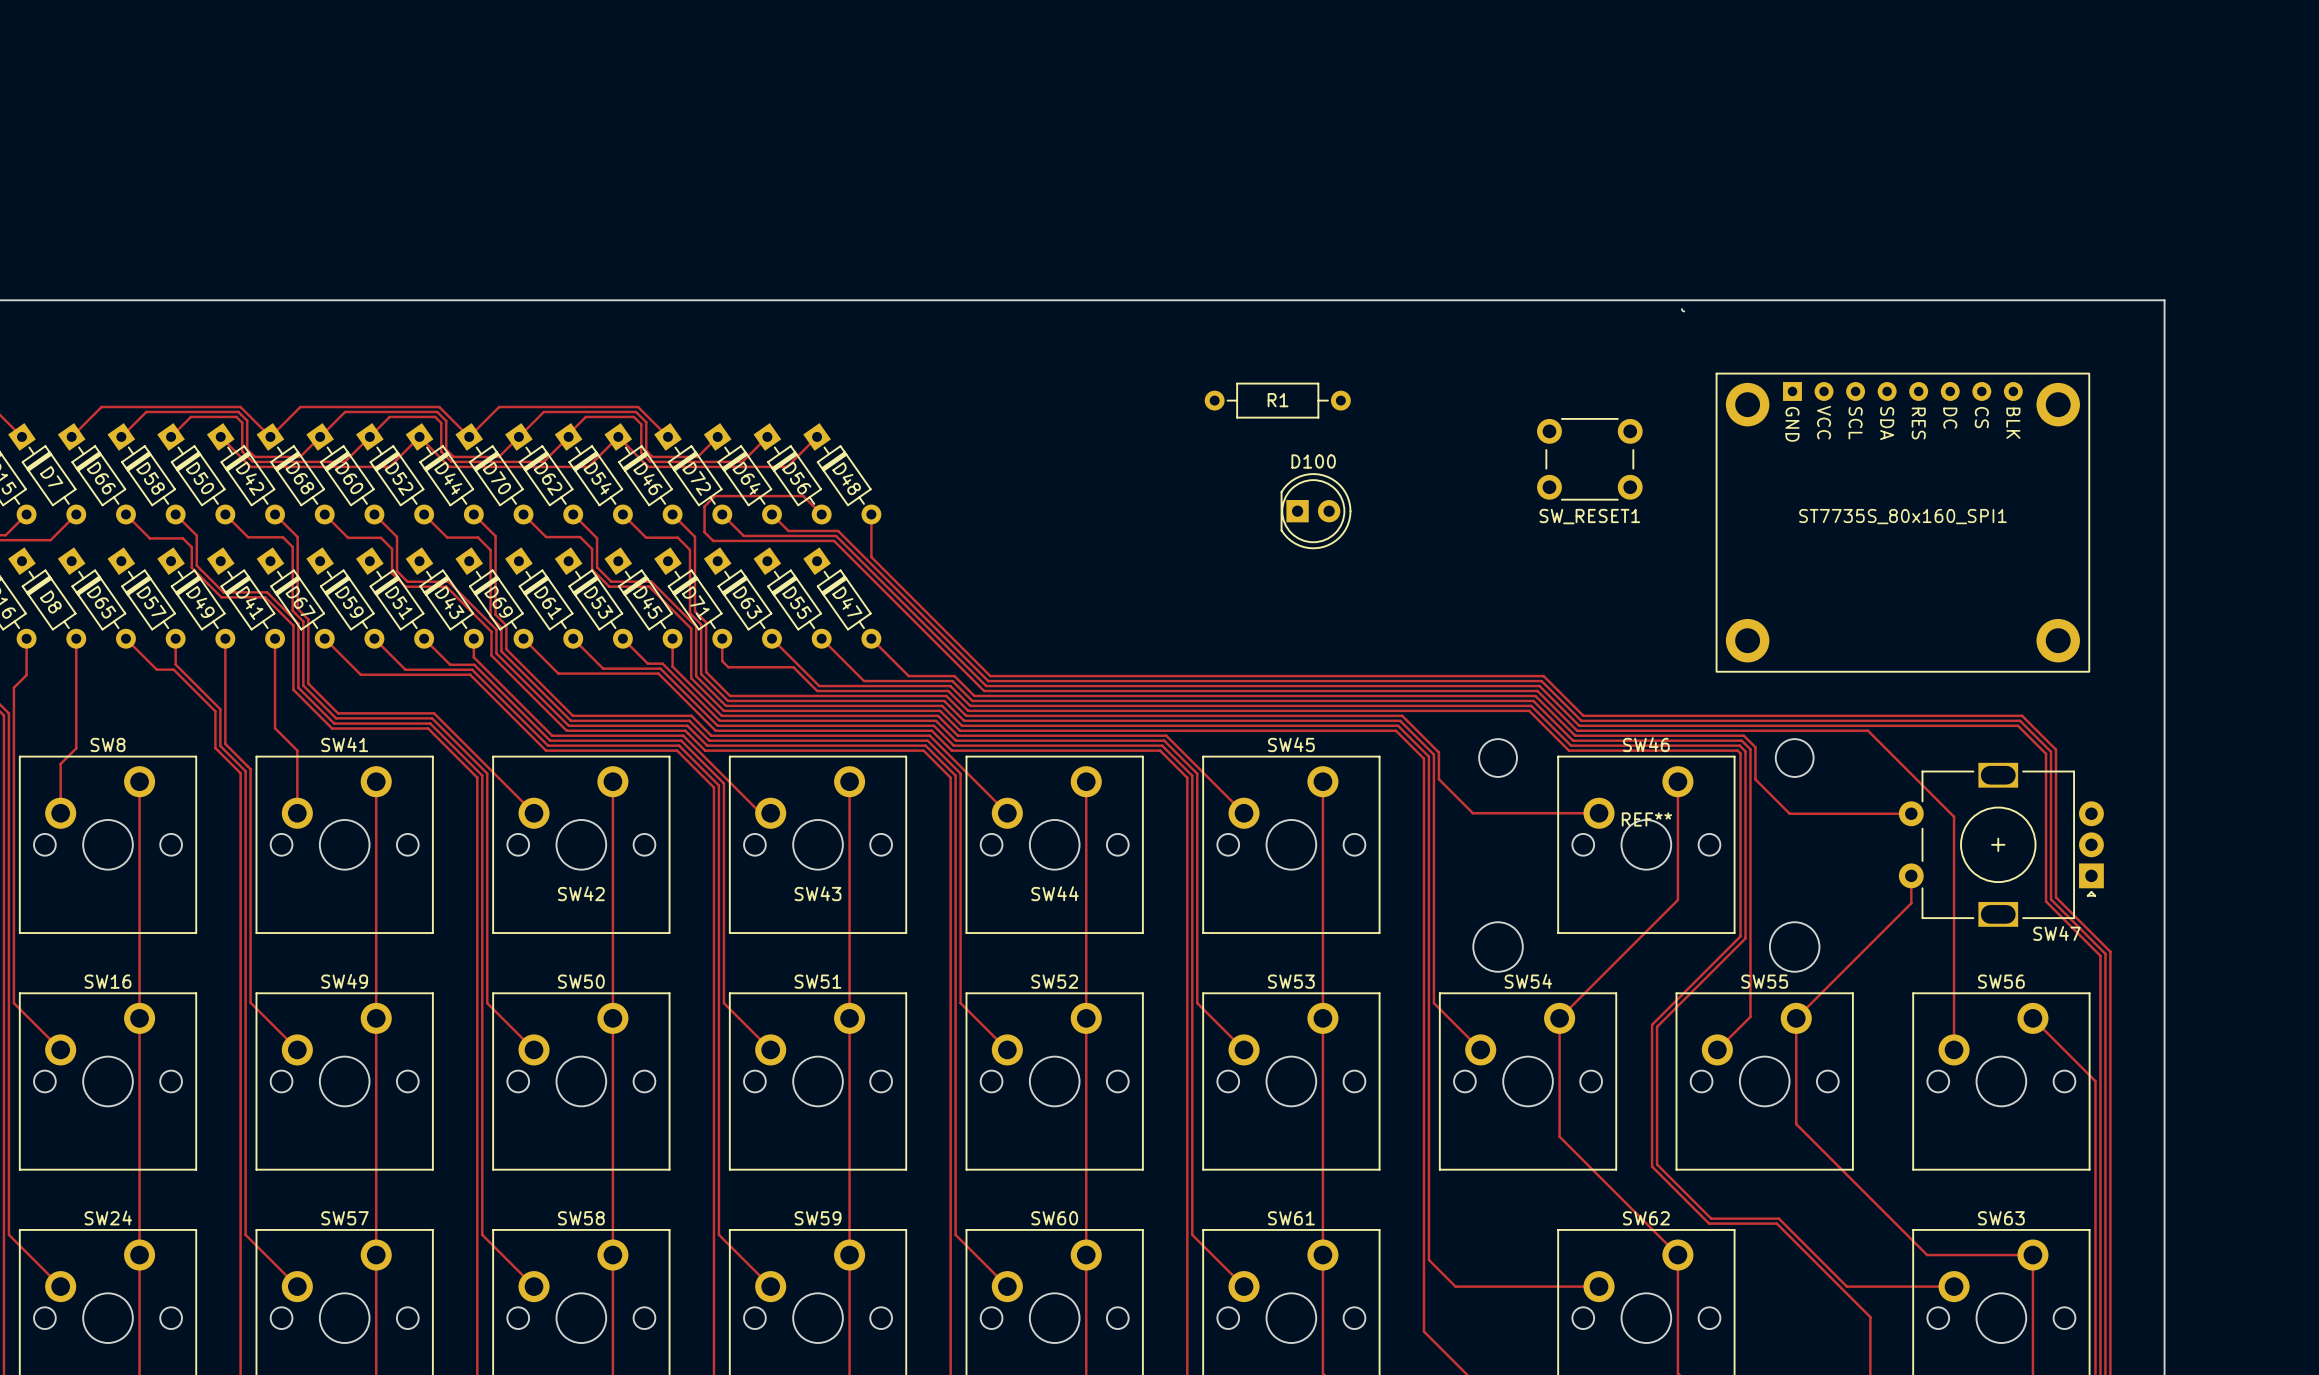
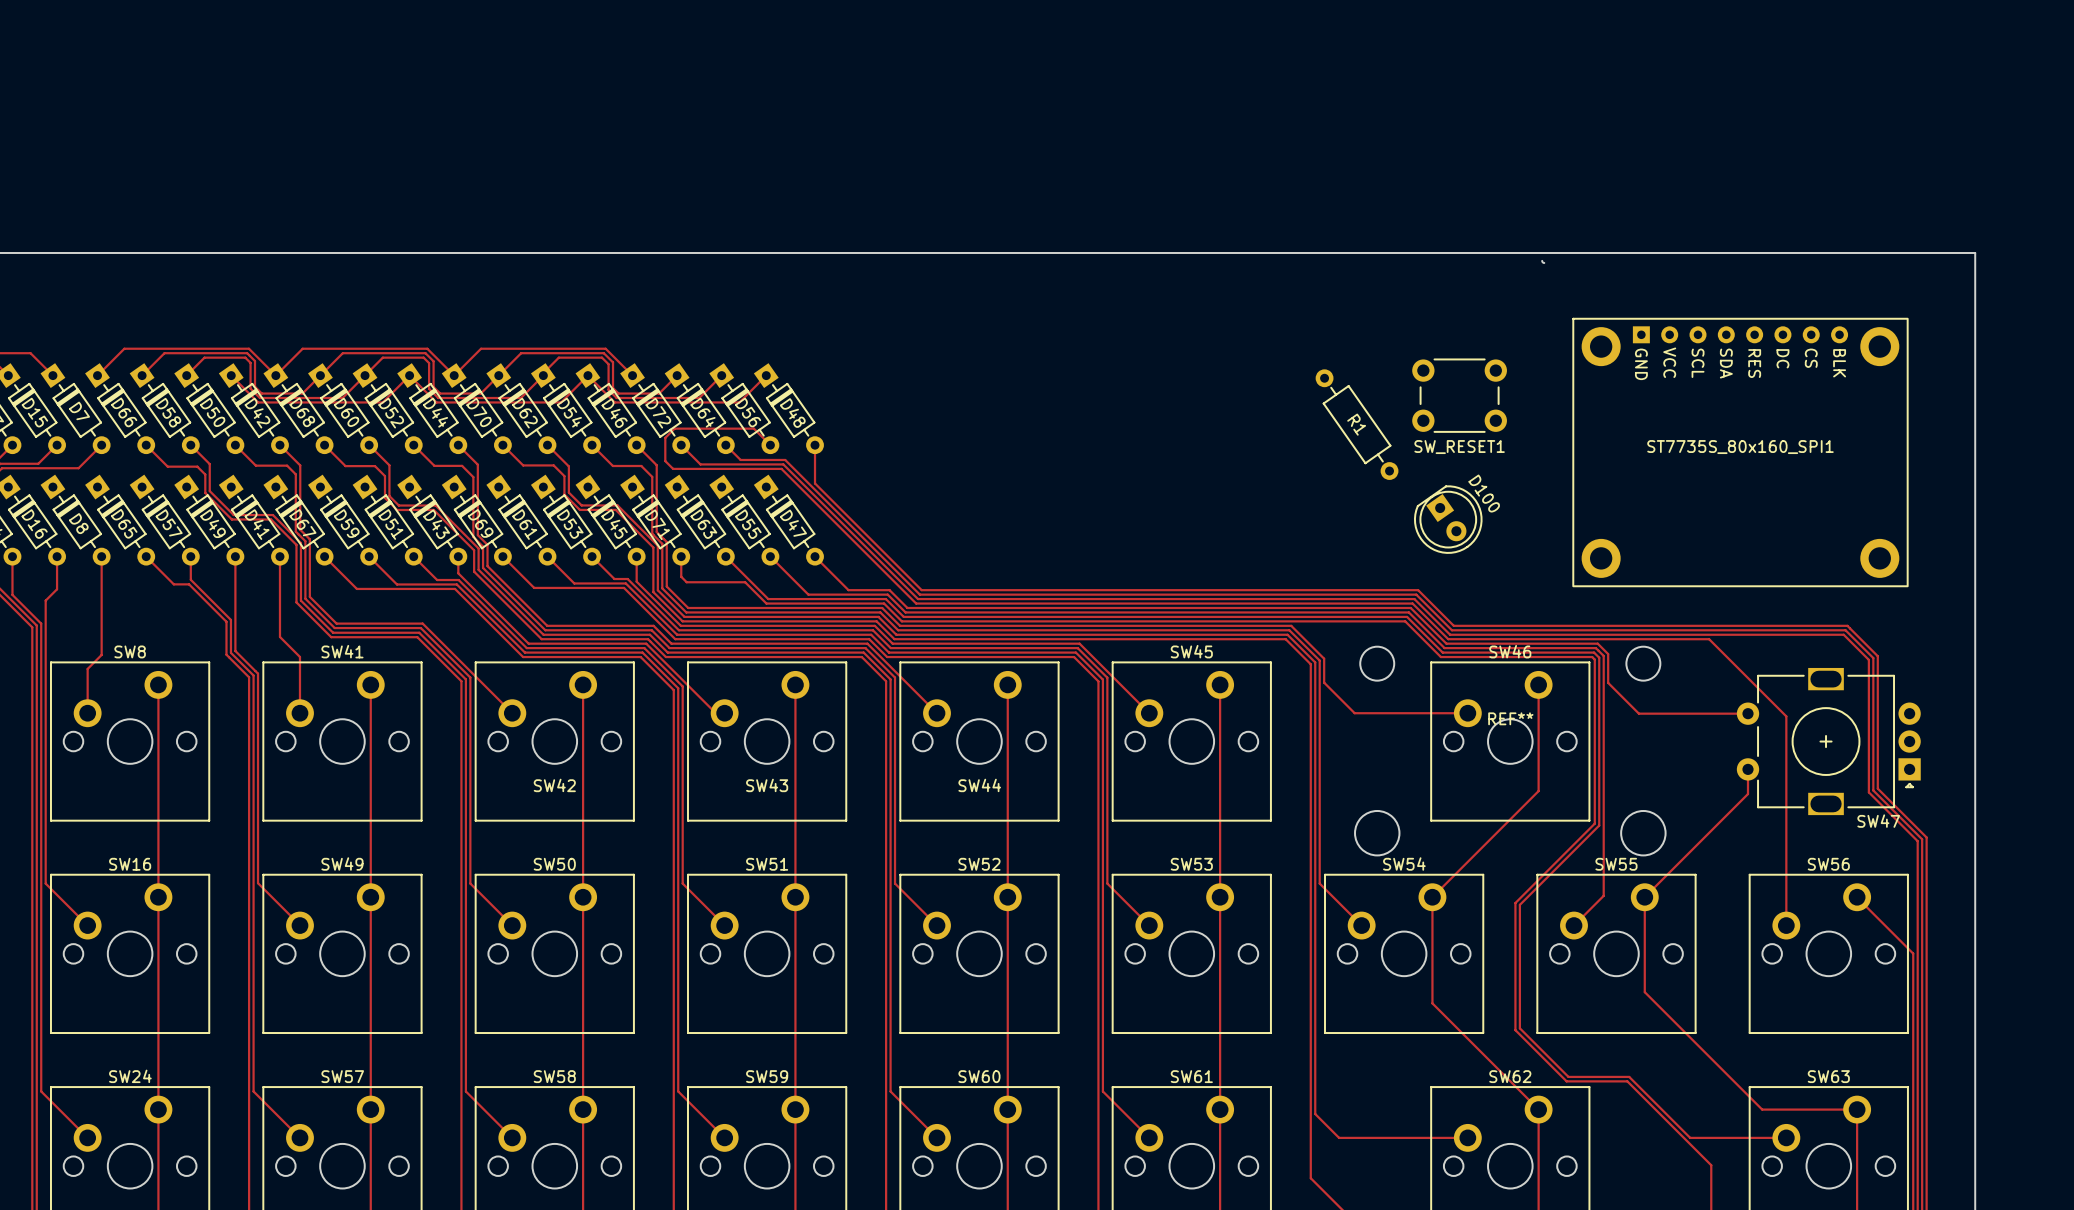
R1 rotation: 0° (1277, 400) -> 55° clockwise (1357, 424)
R1 position: (1277, 400) -> (1357, 424)
D100 name position: D100 (1313, 461) -> D100 (1484, 493)
D100 footprint: [1280, 473, 1352, 550] -> [1414, 485, 1483, 554]

